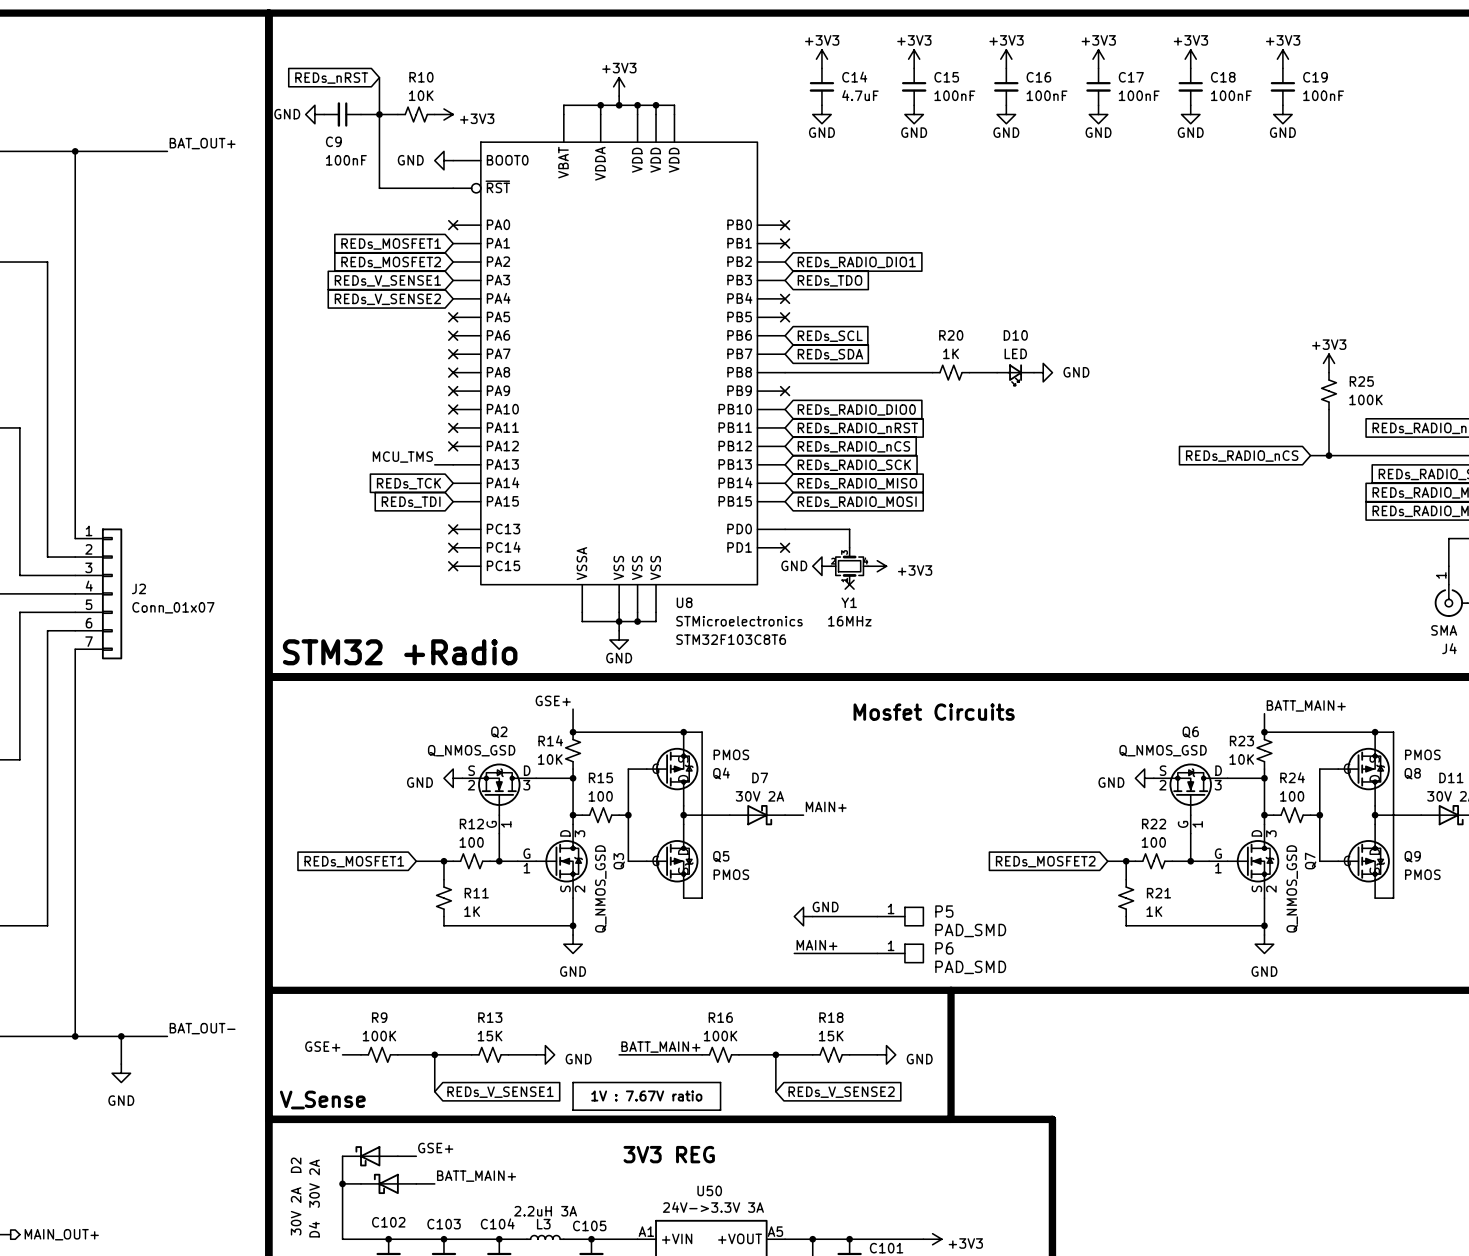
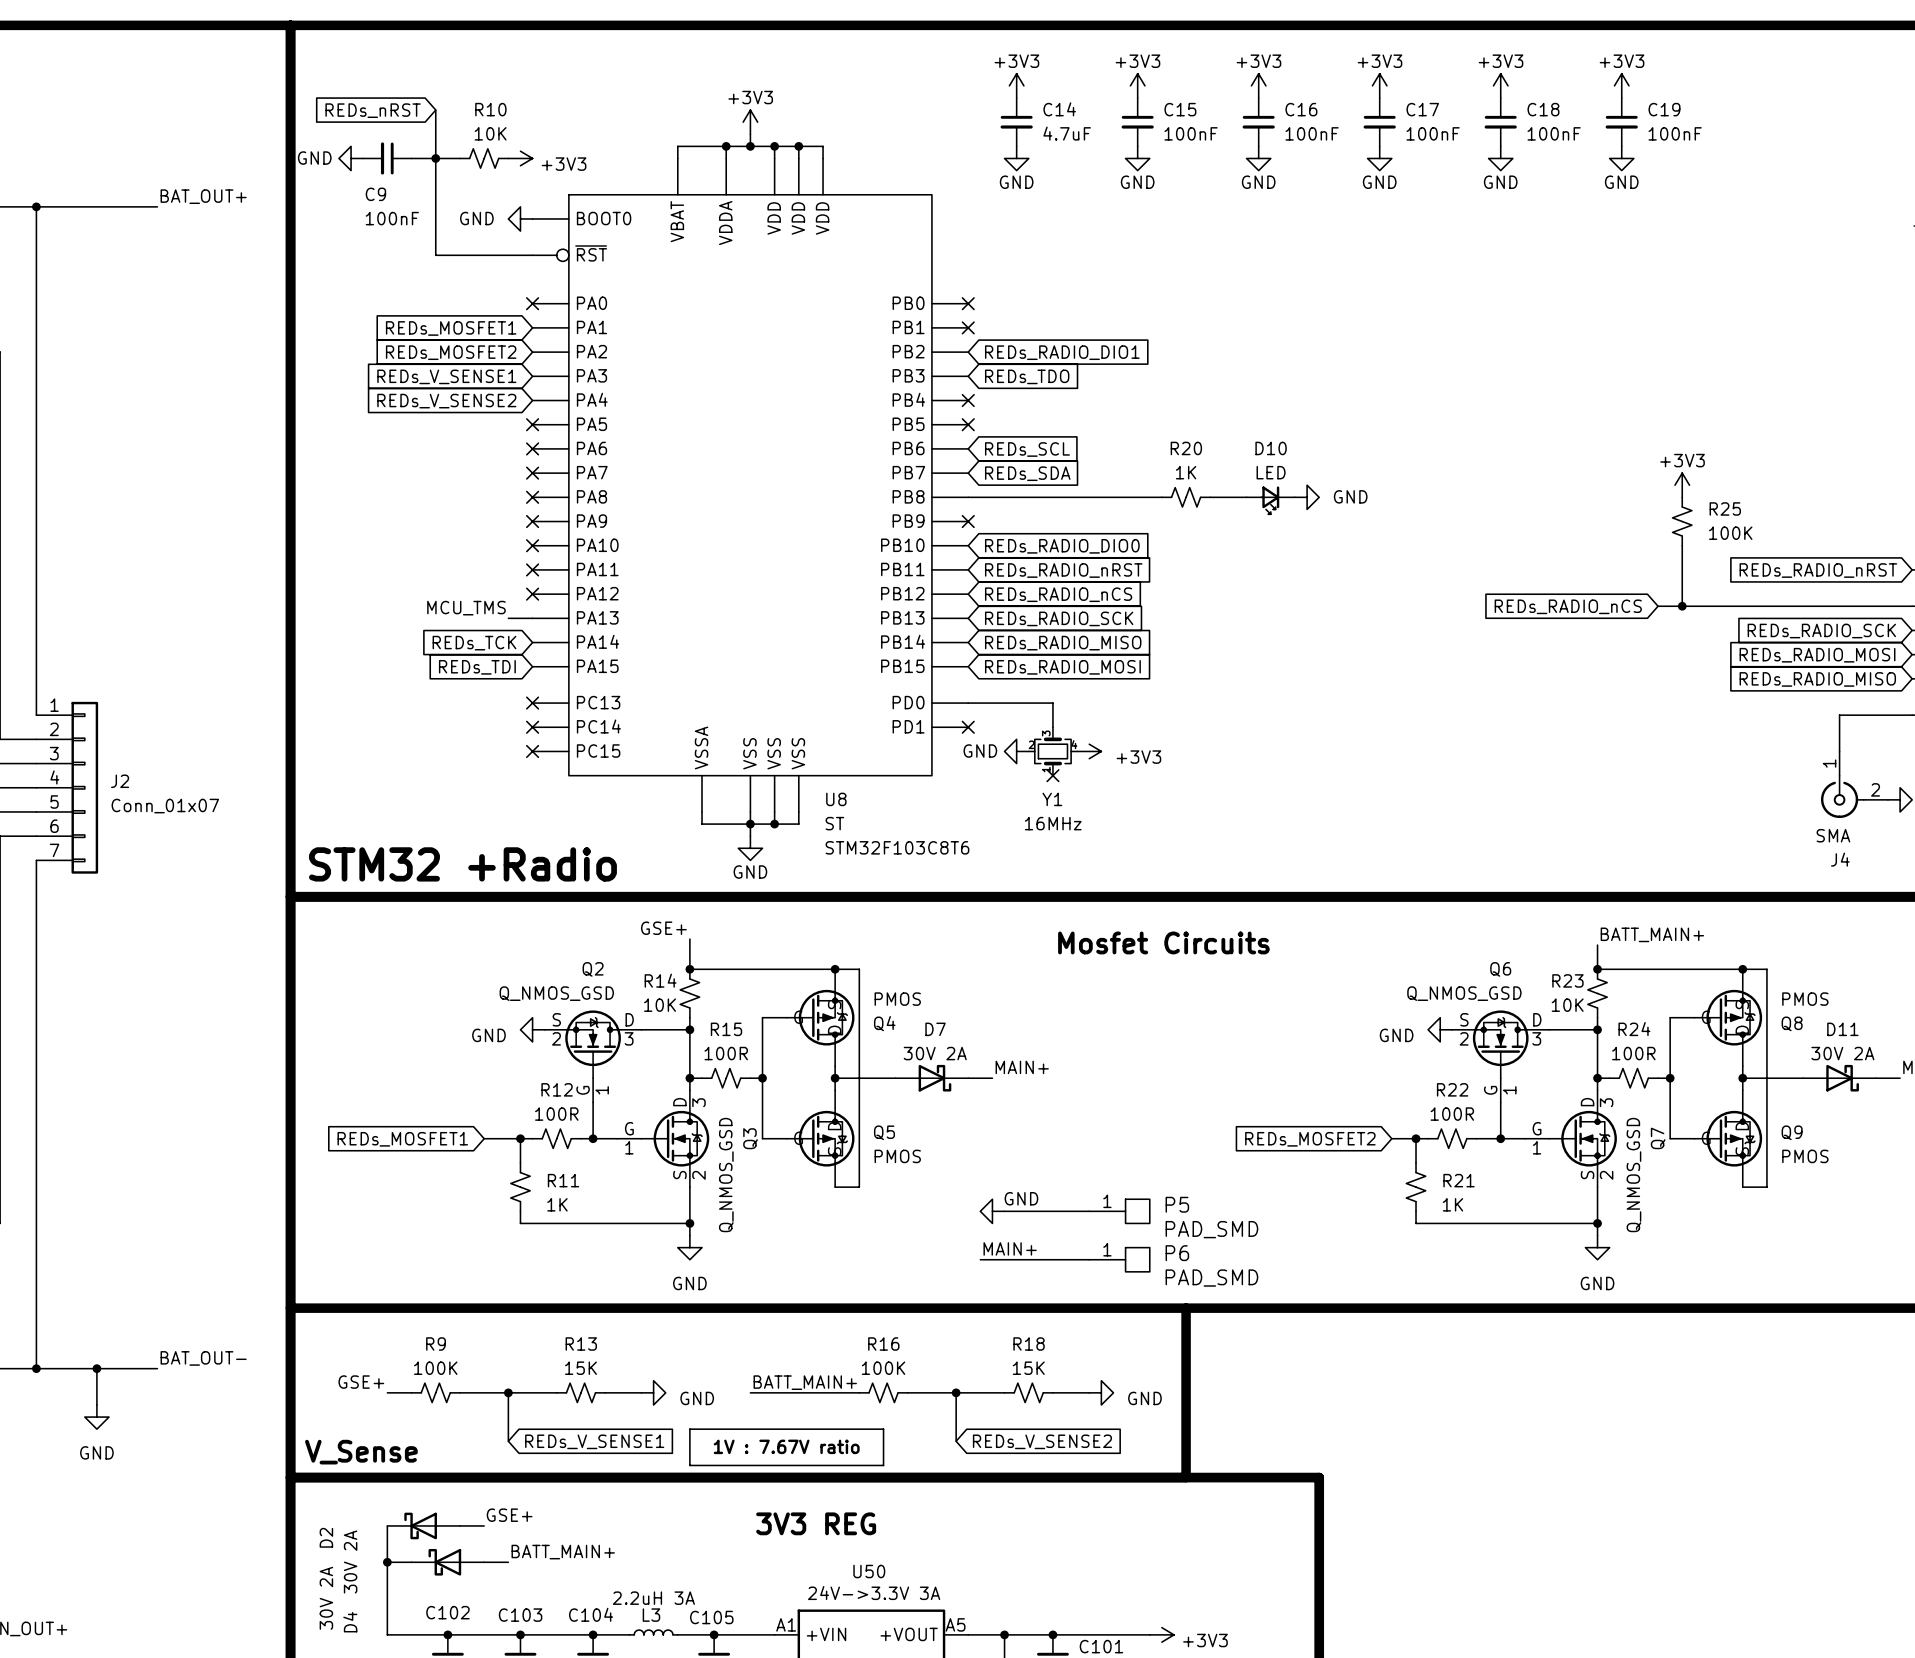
U8 text: STMicroelectronics (739, 621) -> ST (834, 823)
R15 value: 100 (600, 796) -> 100R (726, 1053)
R24 value: 100 (1292, 796) -> 100R (1633, 1053)
R12 value: 100 (471, 842) -> 100R (556, 1114)
R22 value: 100 (1153, 842) -> 100R (1452, 1114)

